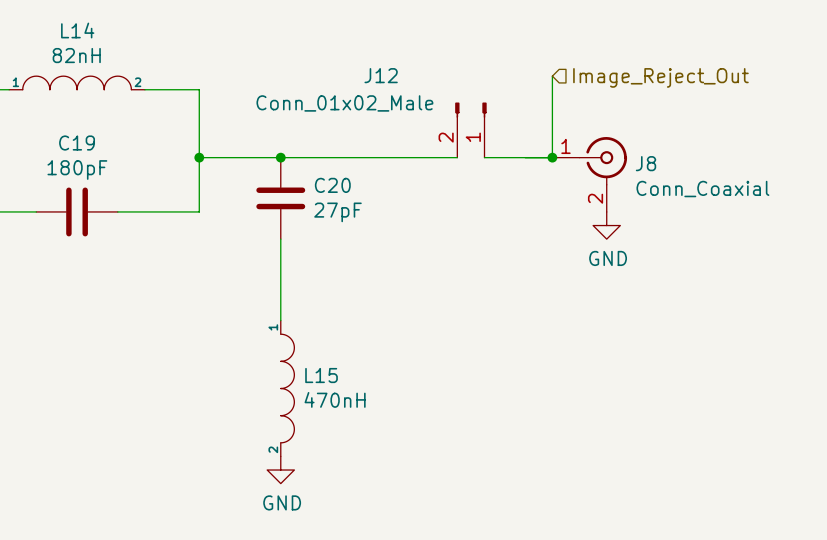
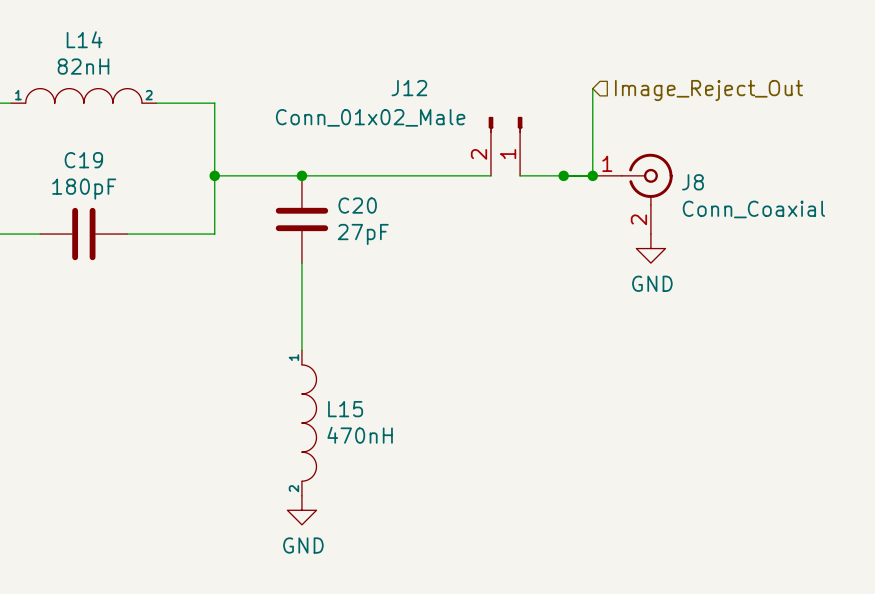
junction: none -> (563, 175)

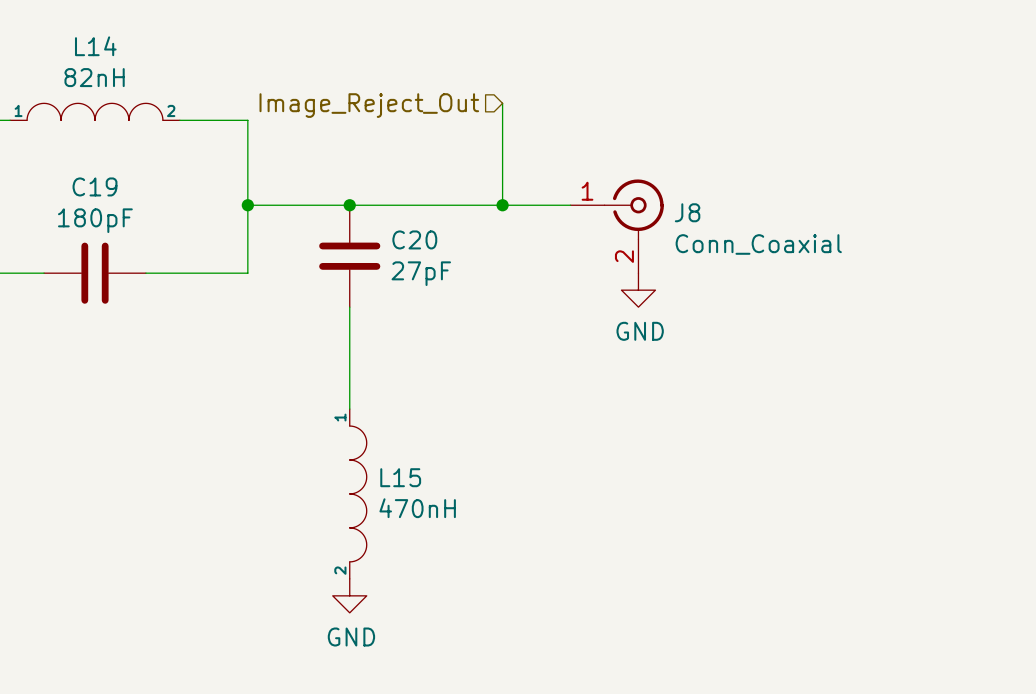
wire: none -> (502, 103) (502, 205)
wire: (592, 88) (592, 175) (520, 175) -> none
hierarchical label rotation: 0° (708, 90) -> 180° (369, 105)
hierarchical label position: Image_Reject_Out (708, 90) -> Image_Reject_Out (369, 105)
J12: Conn_01x02_Male (505, 146) -> none
junction: none -> (502, 205)
junction: (563, 175) -> none
junction: (592, 175) -> none
J8 position: (632, 193) -> (617, 226)
power symbol position: GND (650, 248) -> GND (638, 290)

